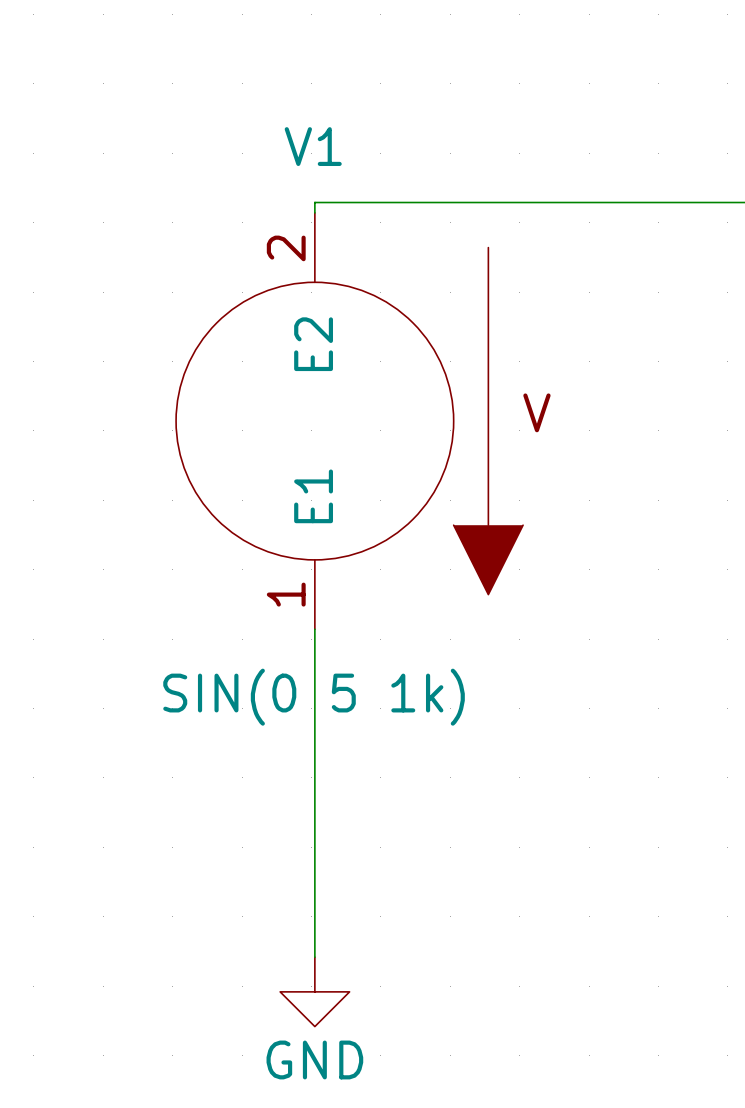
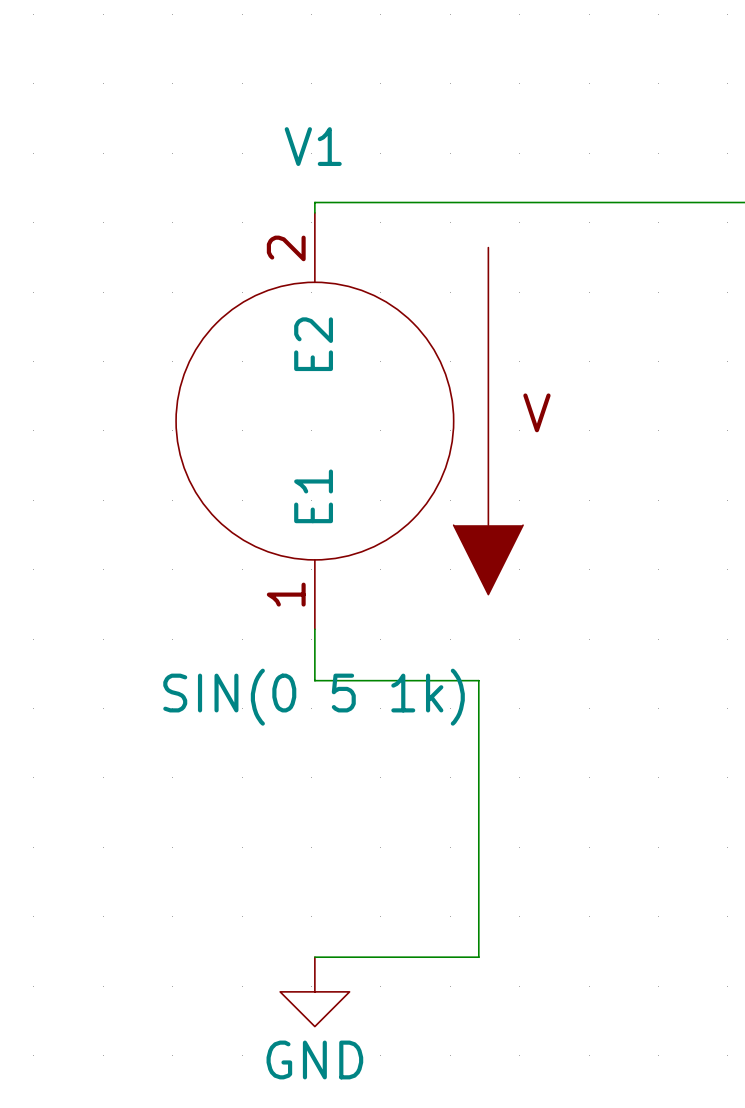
wire: (314, 680) (314, 957) -> (314, 680) (478, 680) (478, 957) (314, 957)

